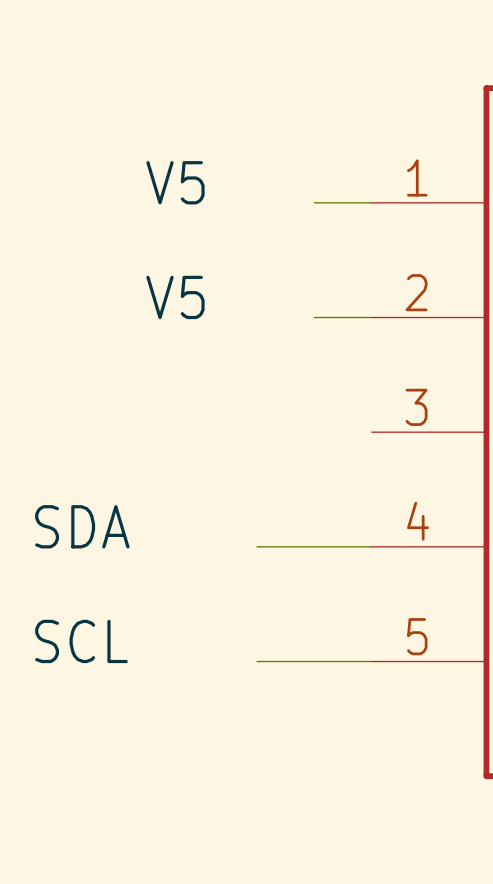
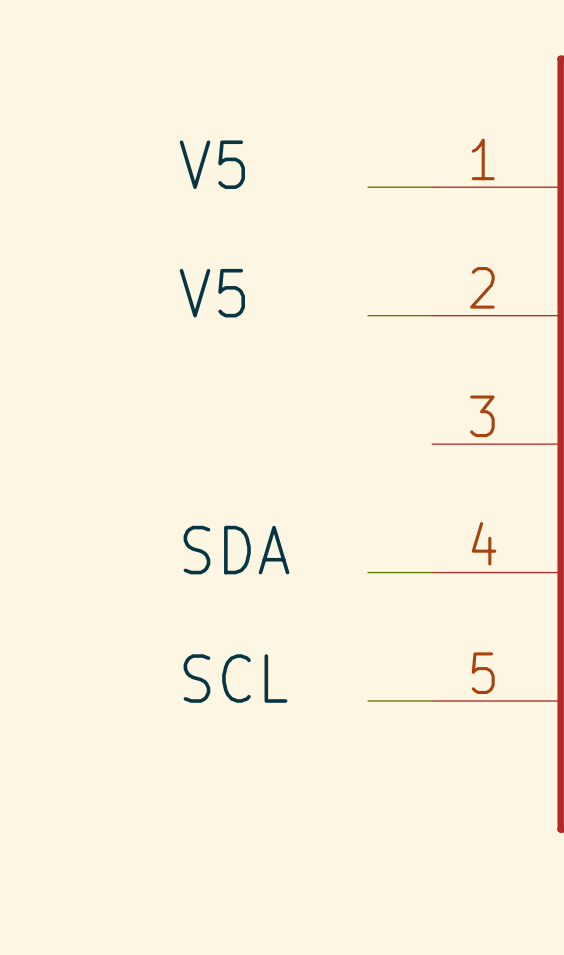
label position: SDA (82, 526) -> SDA (236, 550)
wire: (257, 546) (314, 546) -> none
label position: SCL (81, 641) -> SCL (235, 678)
wire: (257, 661) (314, 661) -> none

